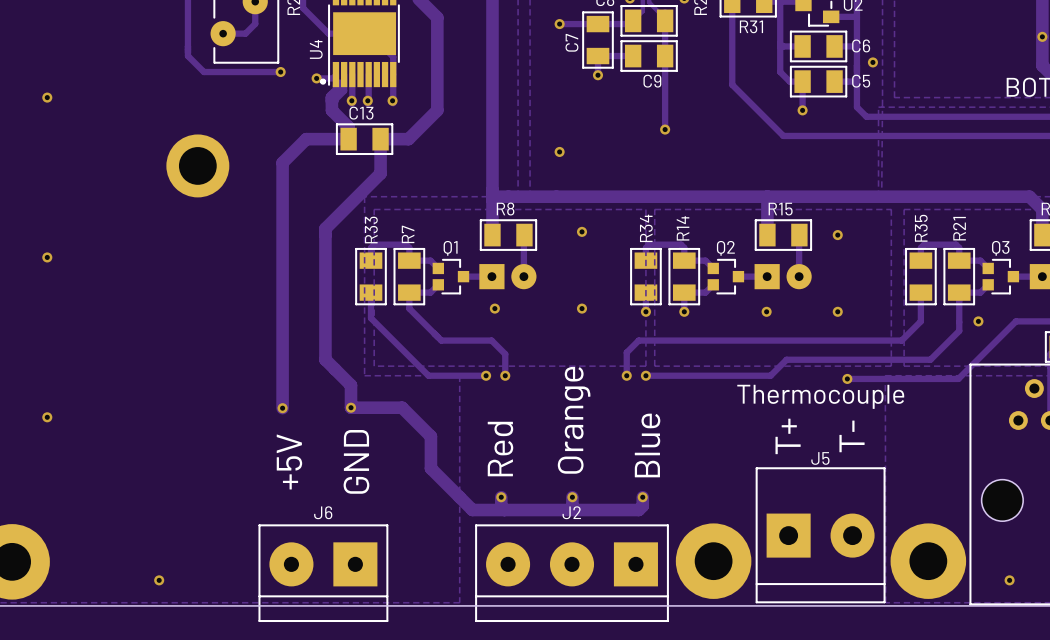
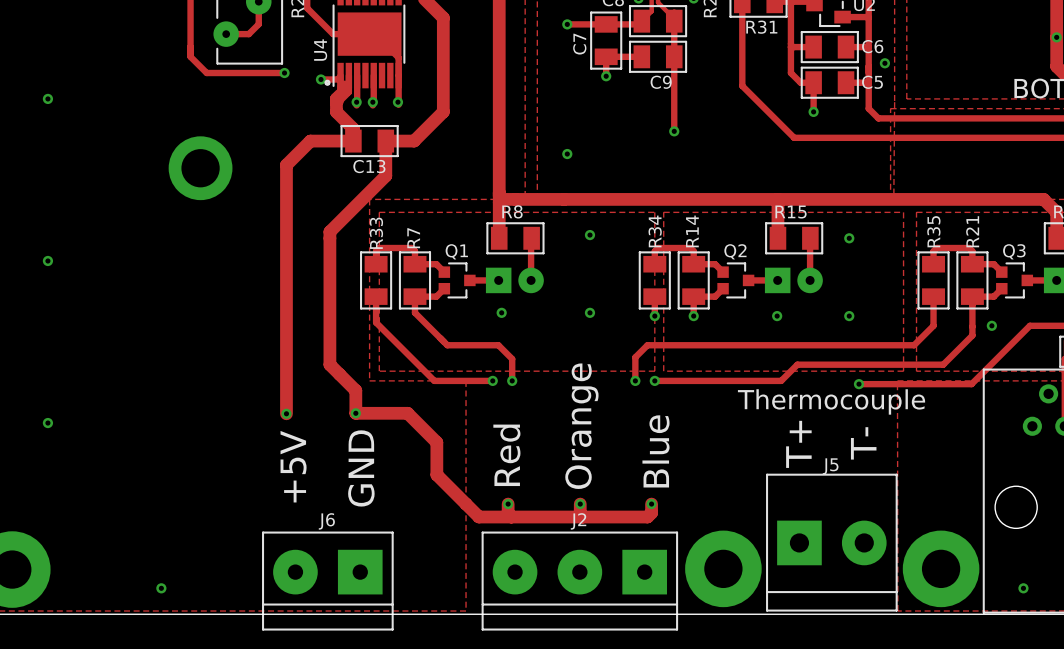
C13 name position: C13 (361, 113) -> C13 (369, 166)

